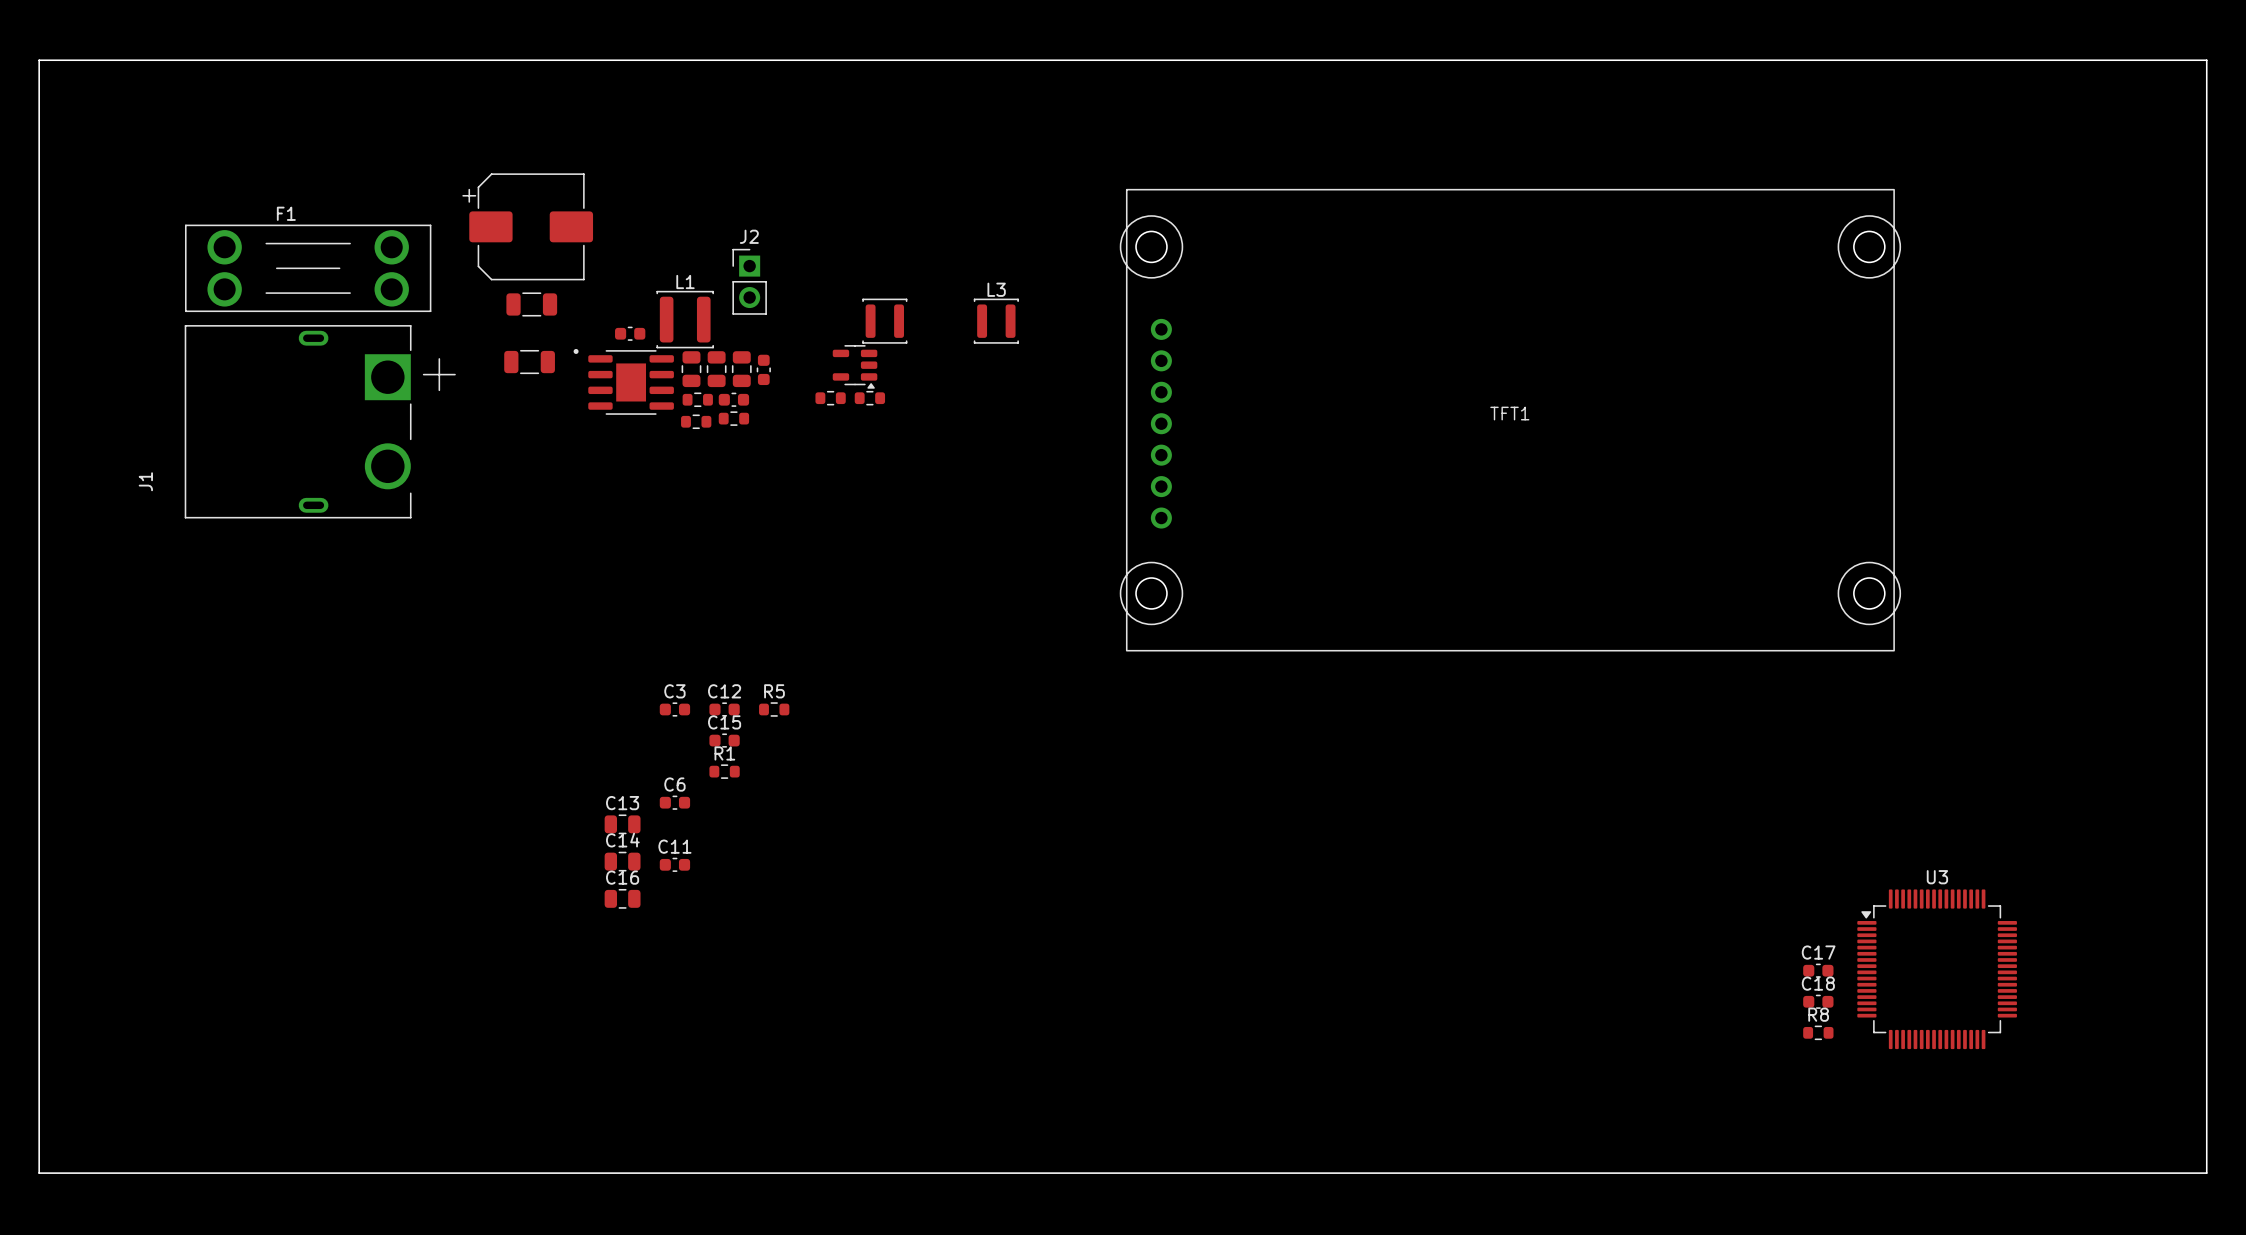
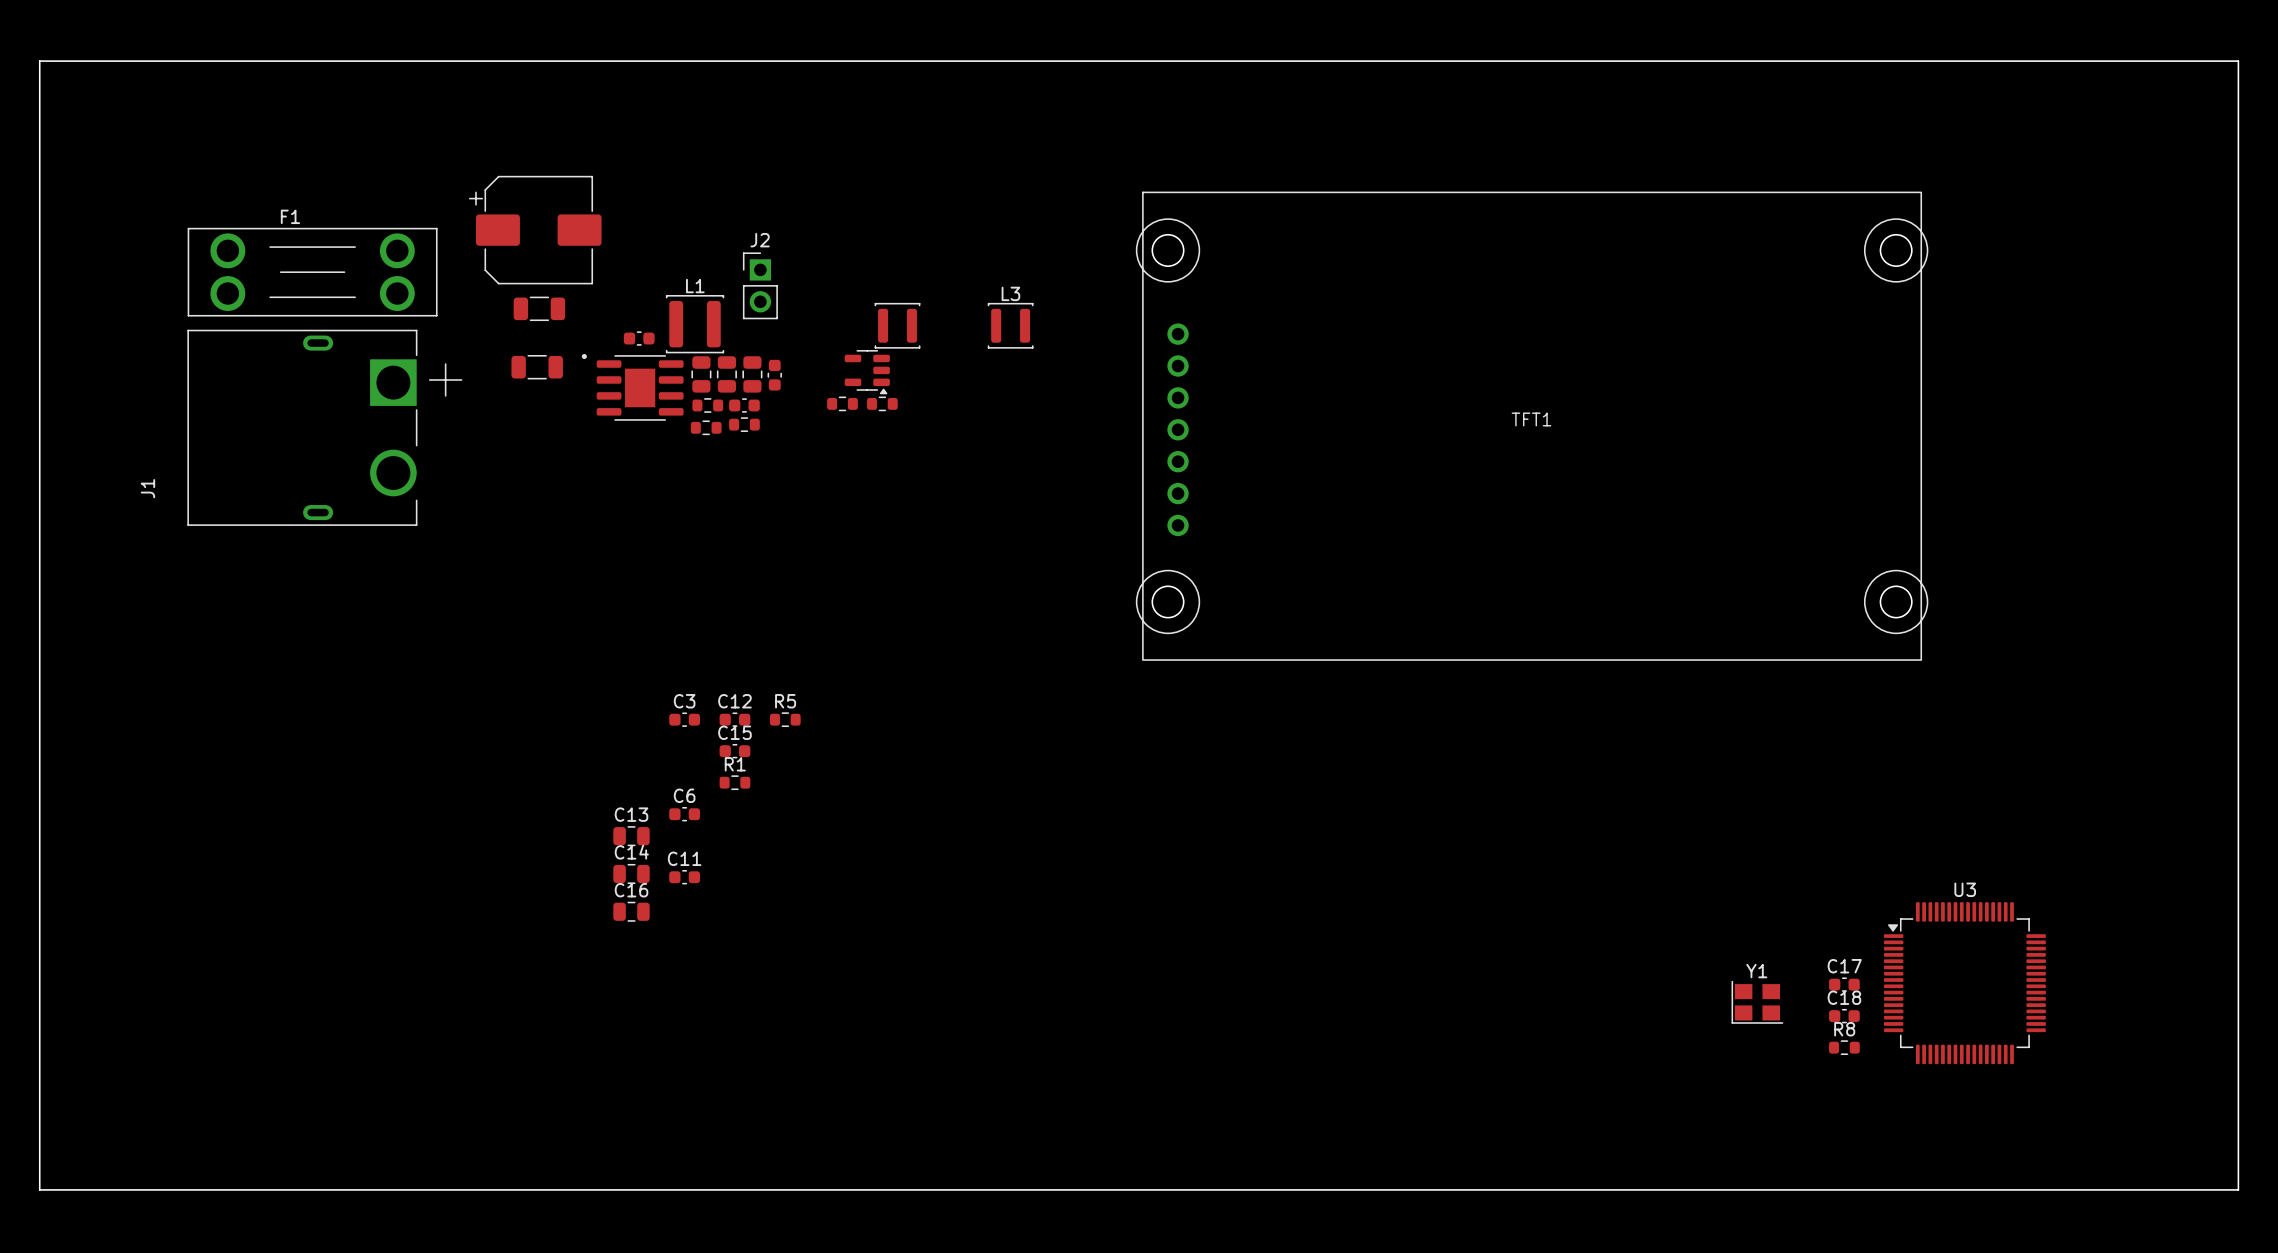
Y1: none -> (1757, 1002)

